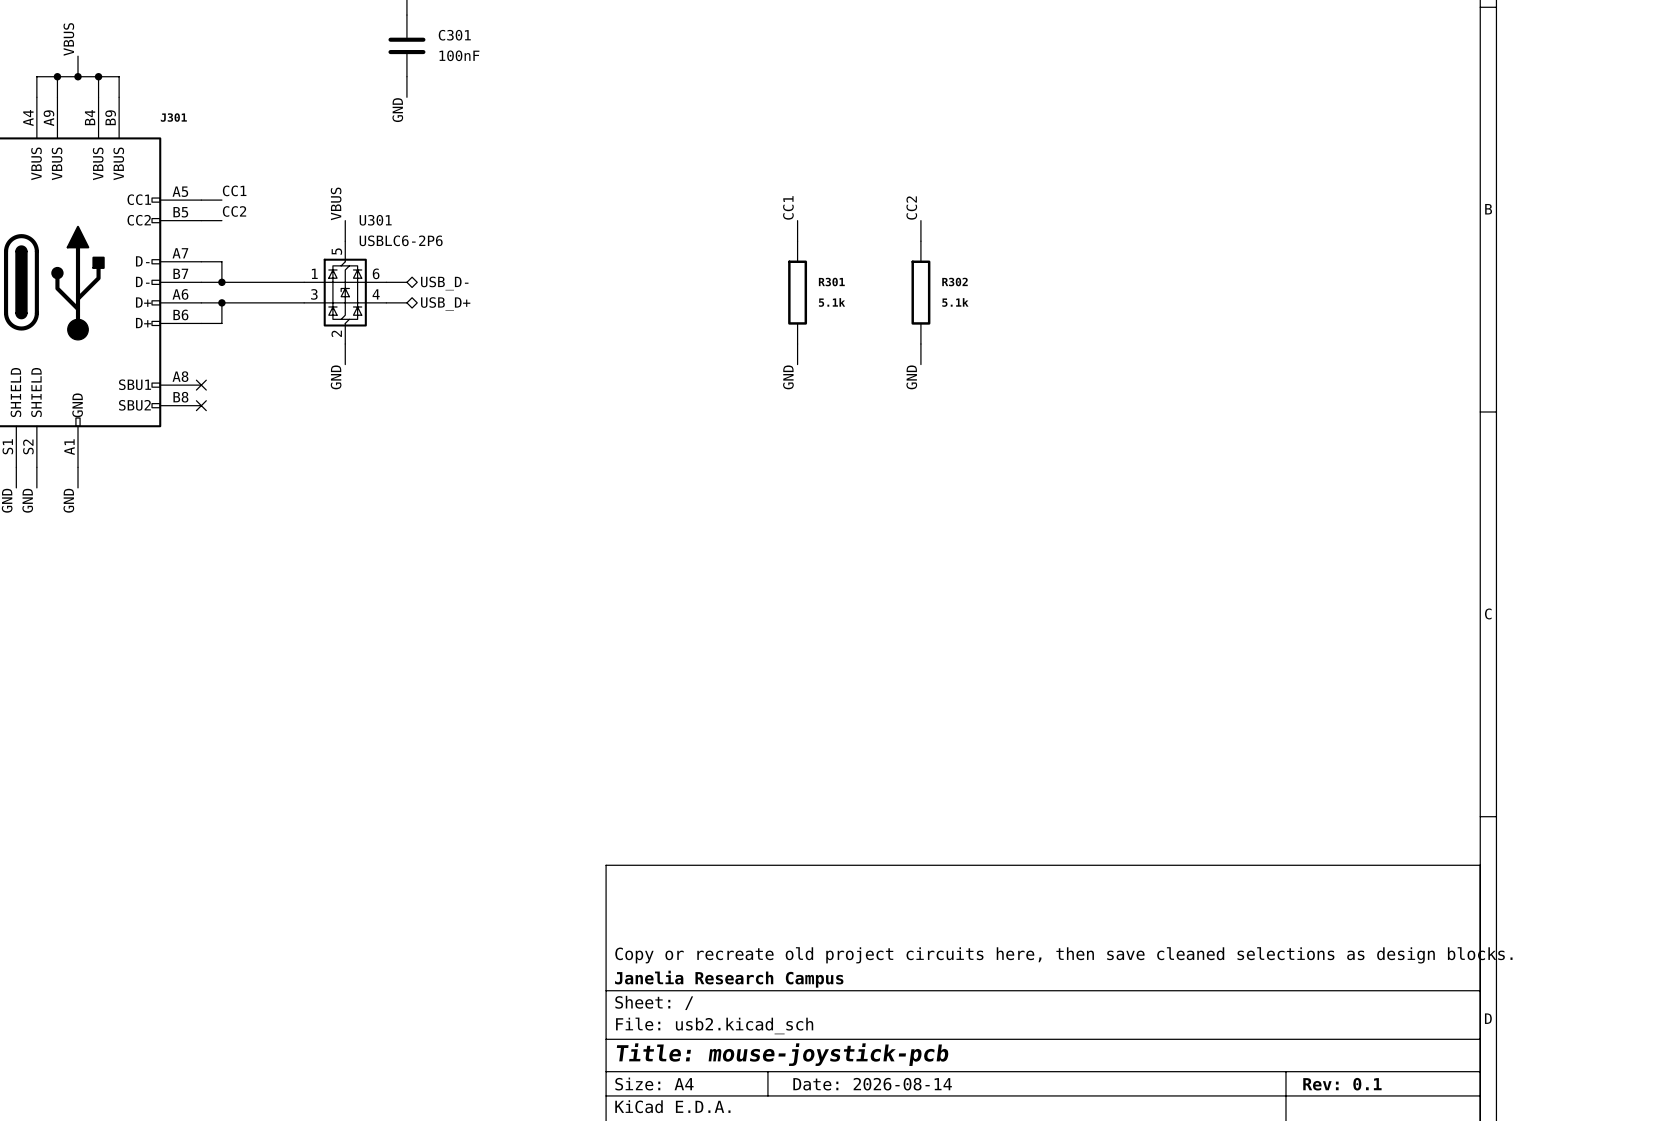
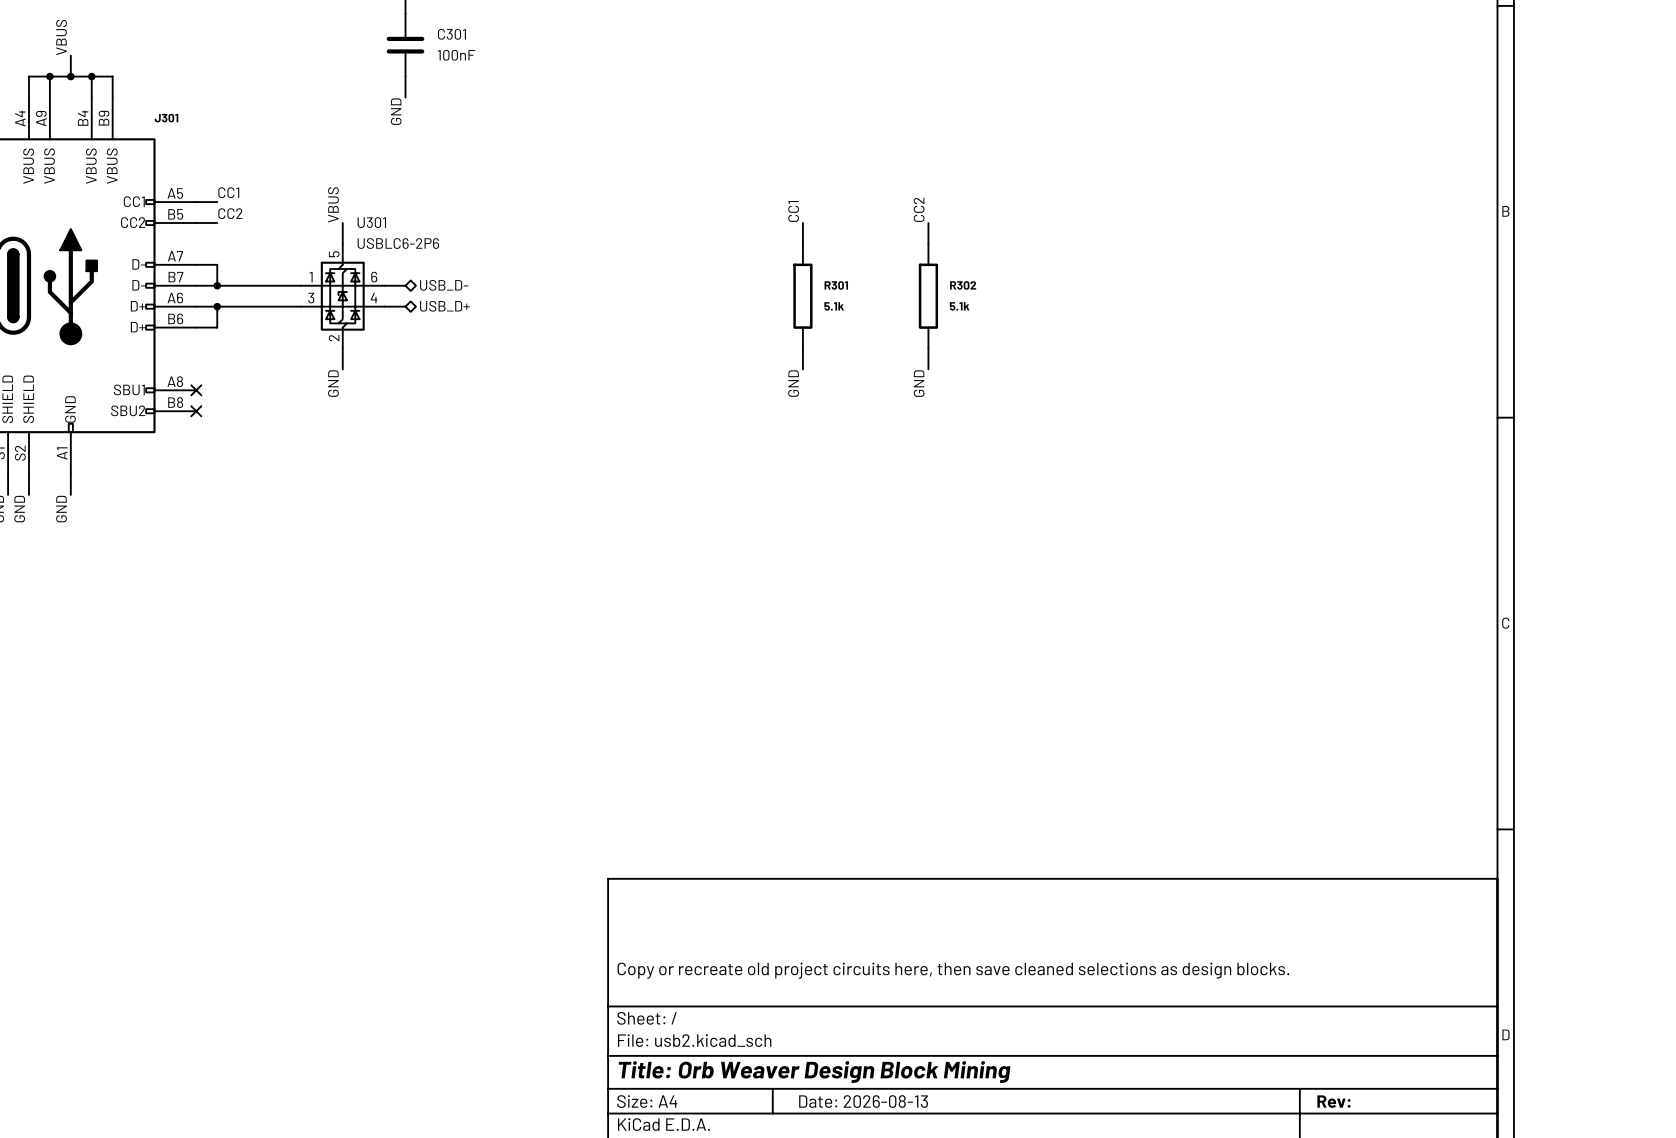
title block: Janelia Research Campus (729, 979) -> none
title block: Title: mouse-joystick-pcb (782, 1054) -> Title: Orb Weaver Design Block Mining (814, 1072)
title block: Date: 2026-08-14 (872, 1084) -> Date: 2026-08-13 (863, 1101)
title block: Rev: 0.1 (1342, 1084) -> Rev: (1333, 1101)

